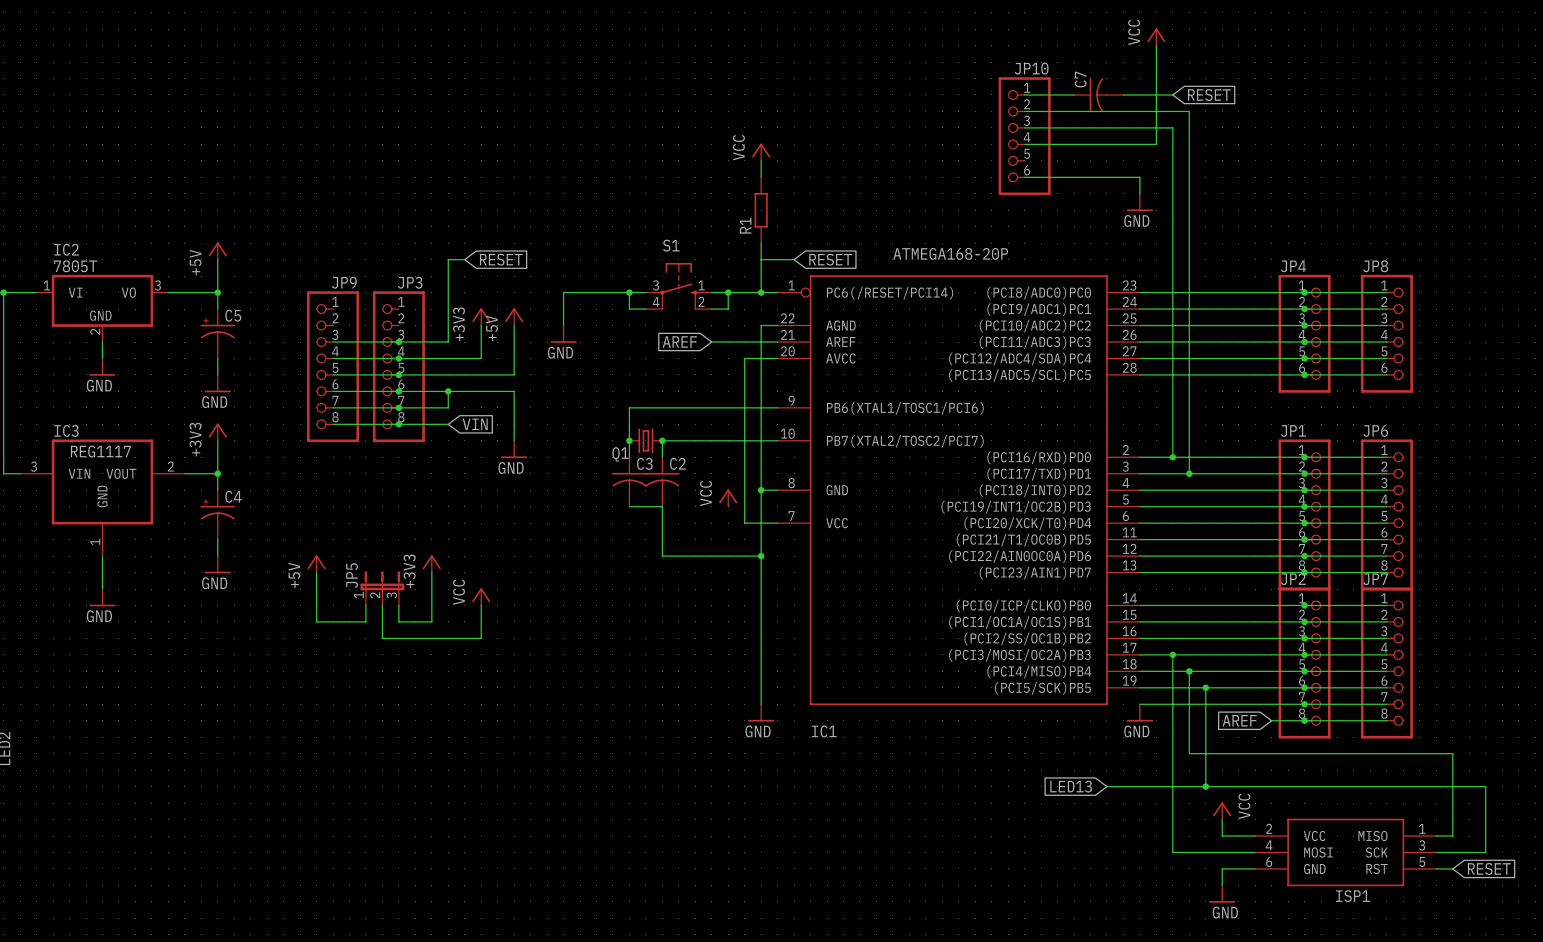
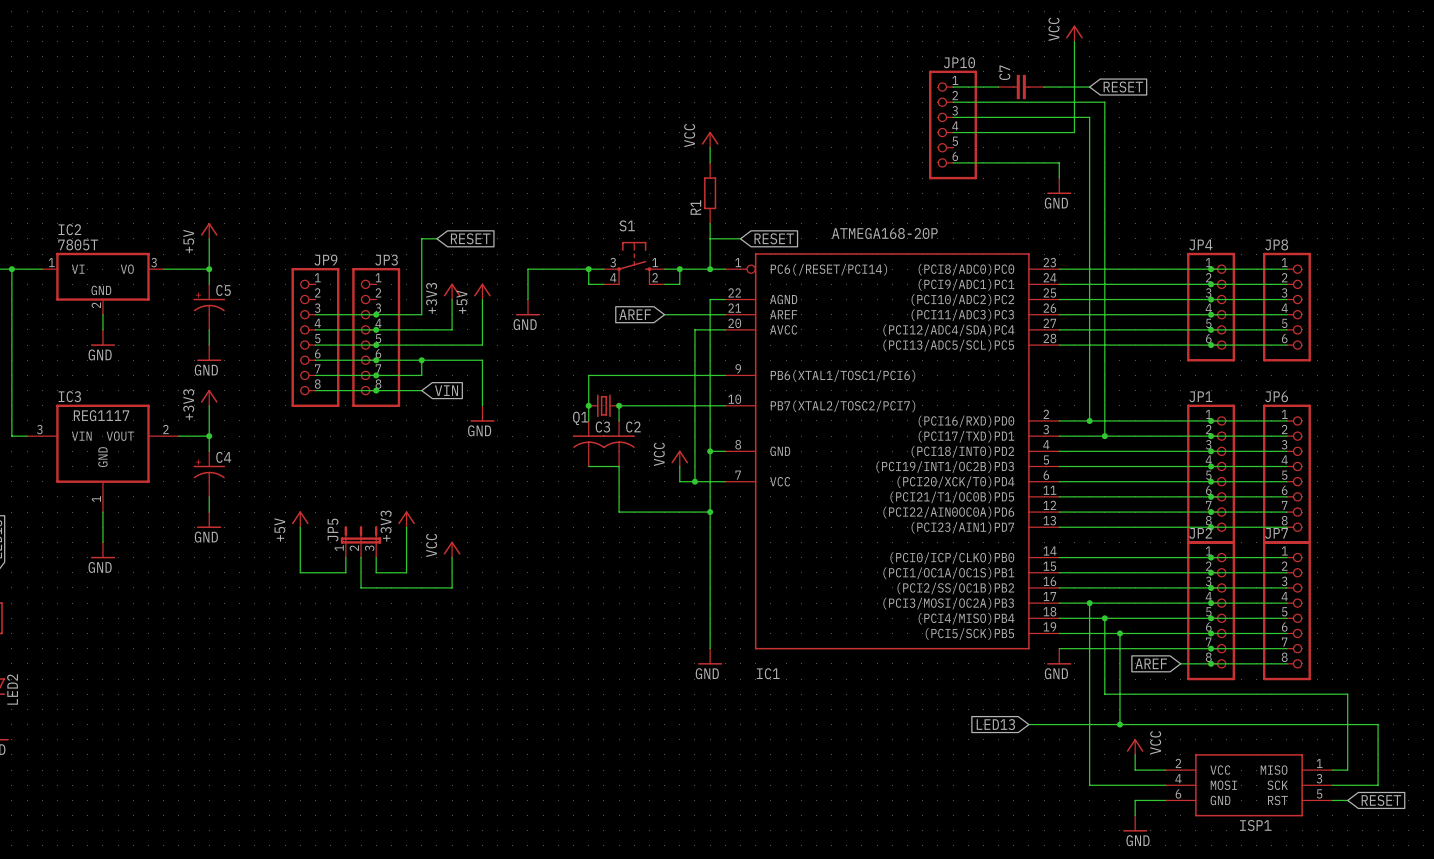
C7 symbol: [1074, 77, 1124, 113] -> [998, 74, 1045, 100]
wire: none -> (679, 466) (679, 481) (694, 481)
junction: none -> (694, 481)

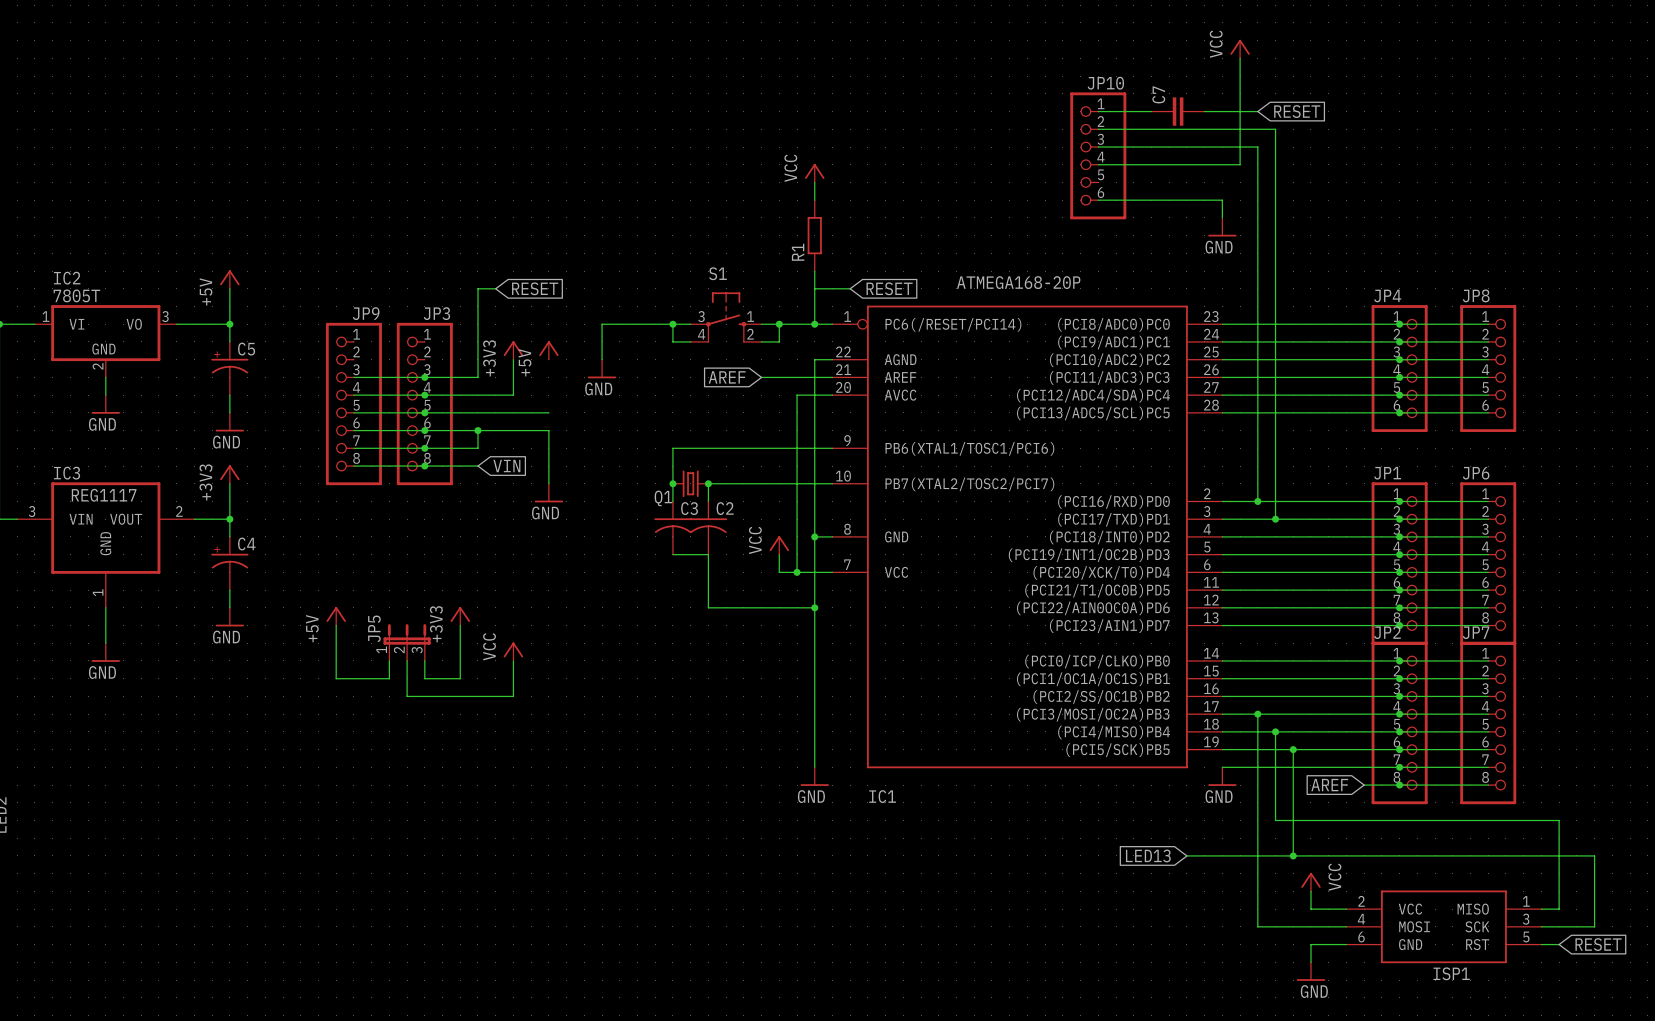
wire: (482, 299) (482, 345) -> none

